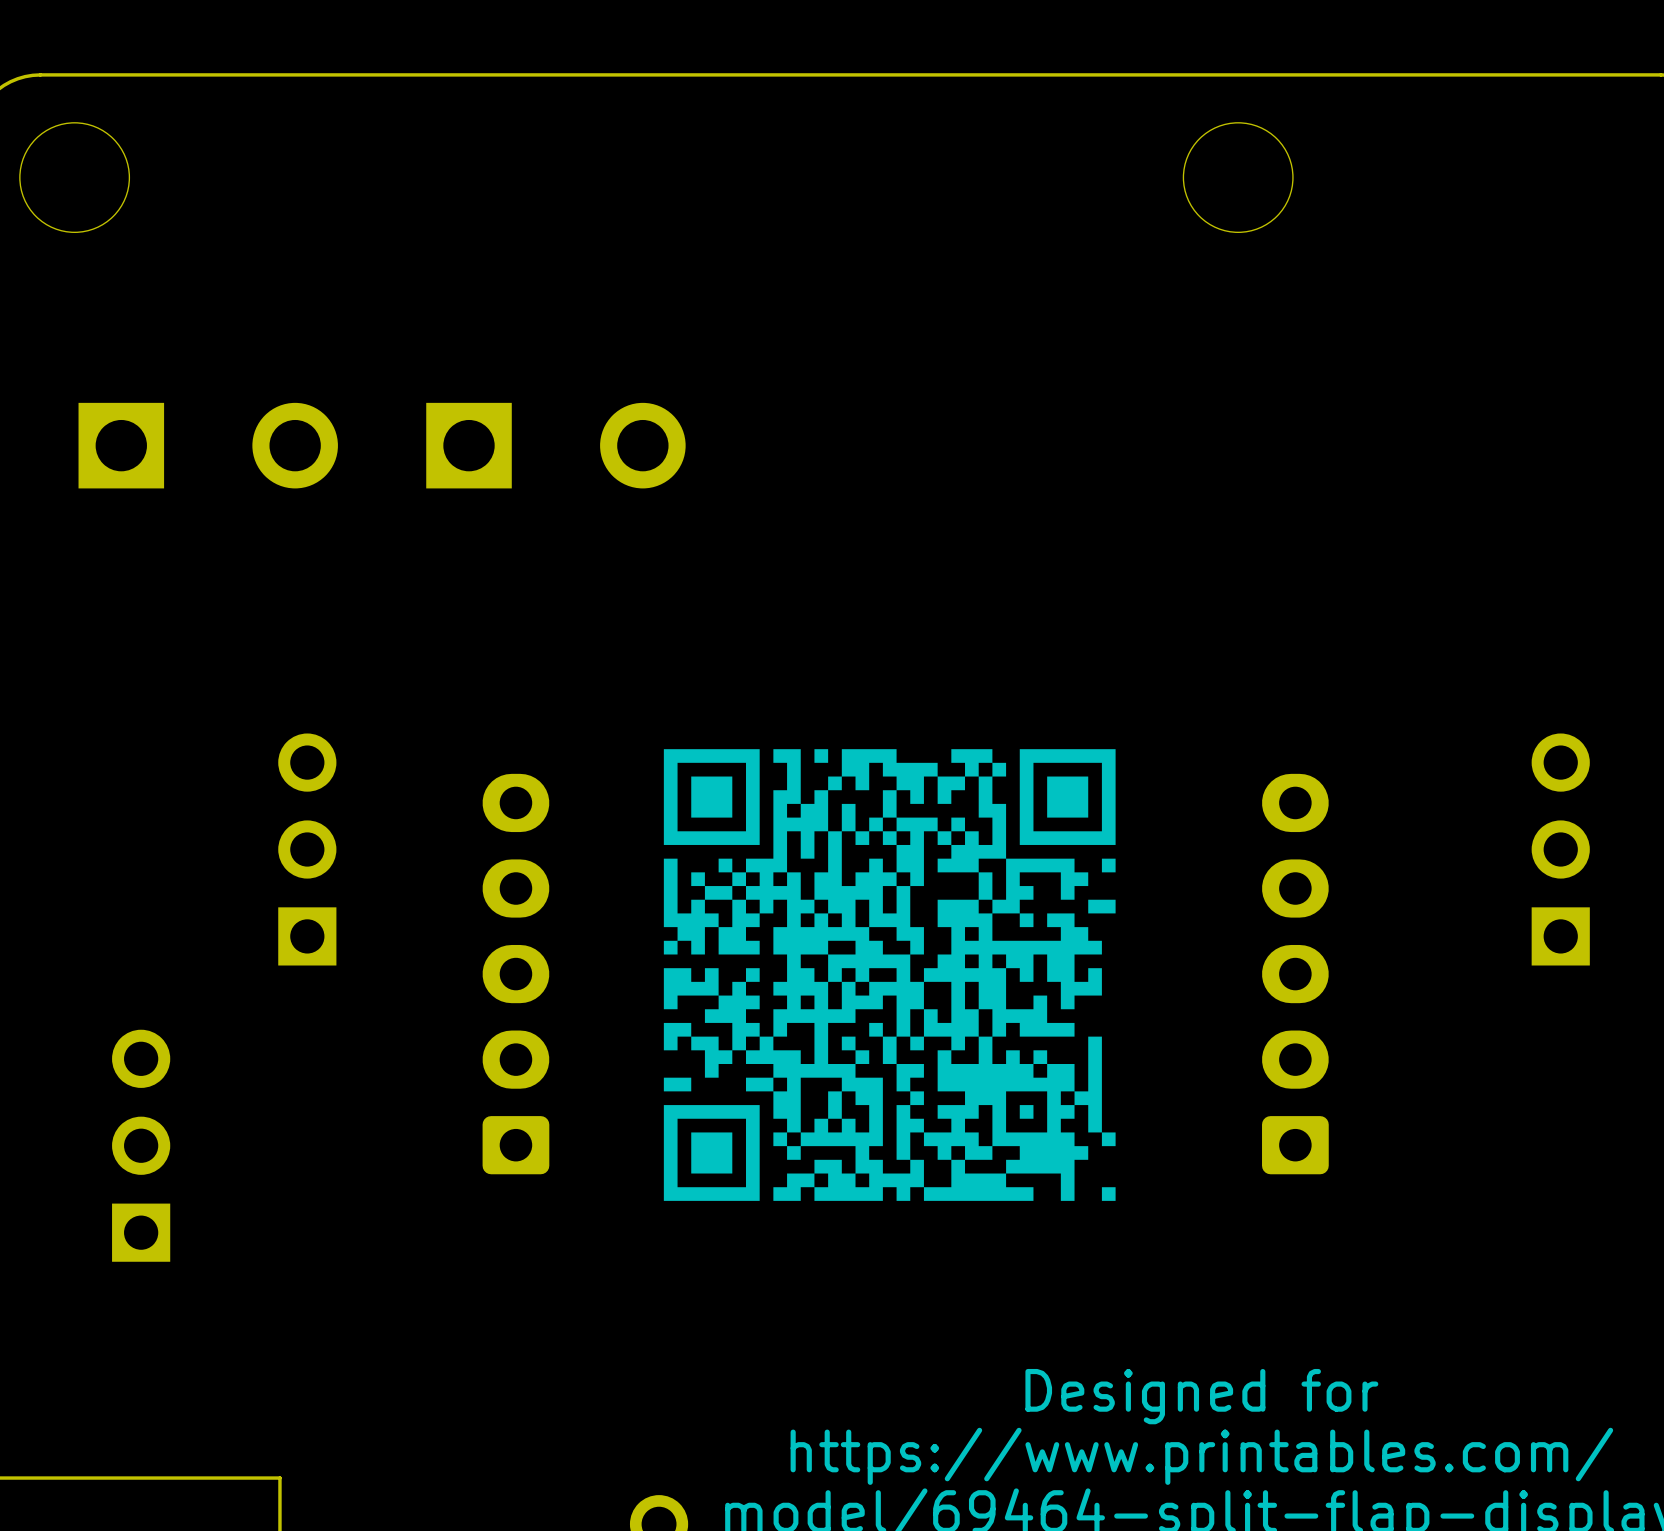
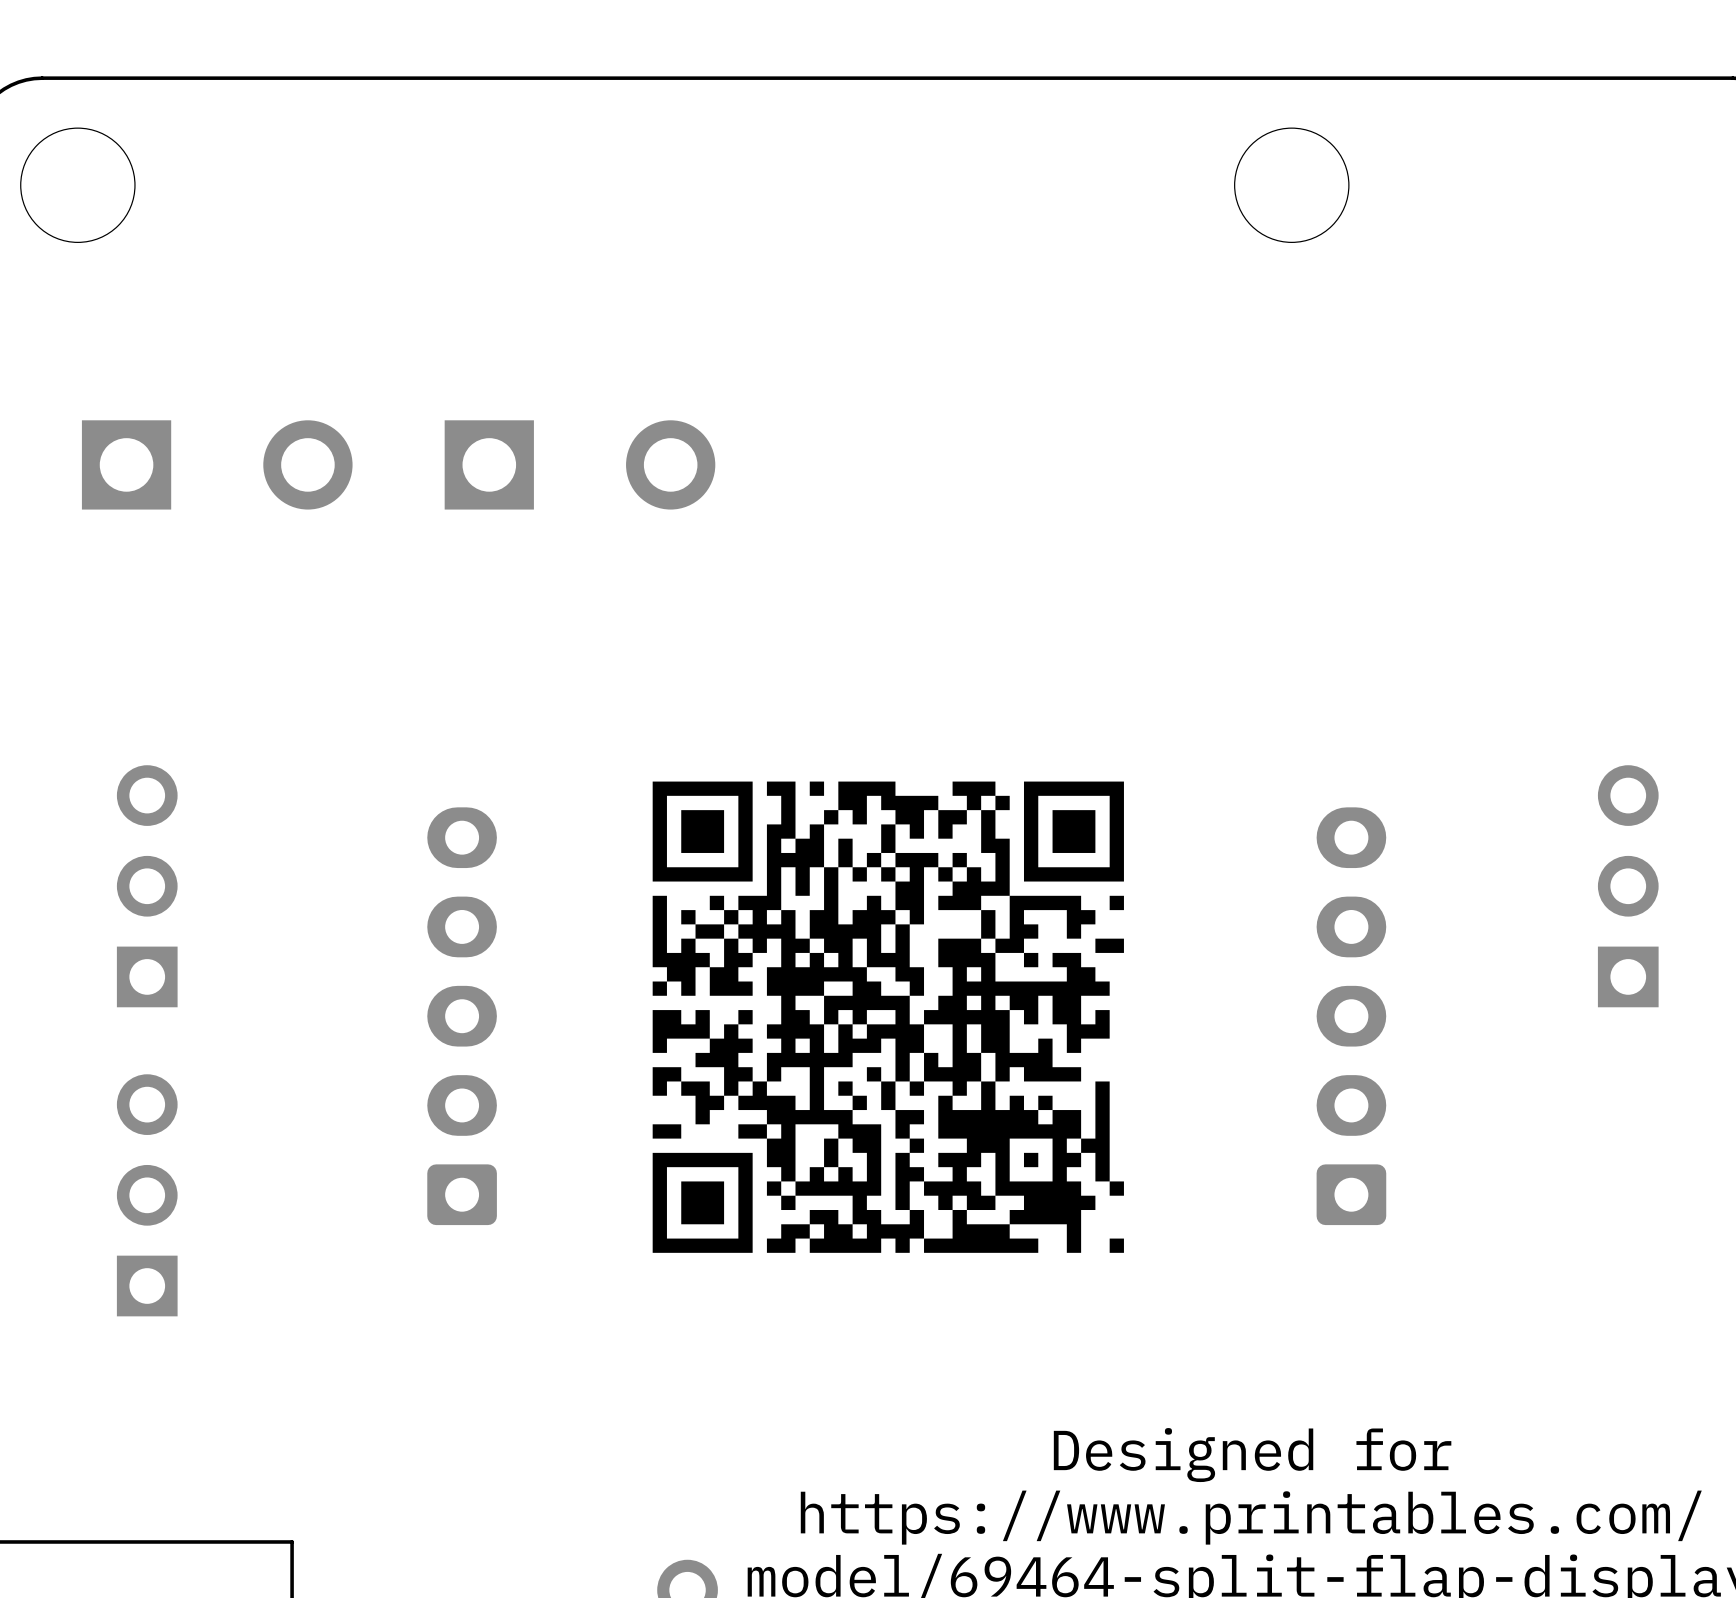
part position: (307, 849) -> (147, 886)
part position: (515, 974) -> (462, 1016)
drawing position: (889, 975) -> (888, 1017)

